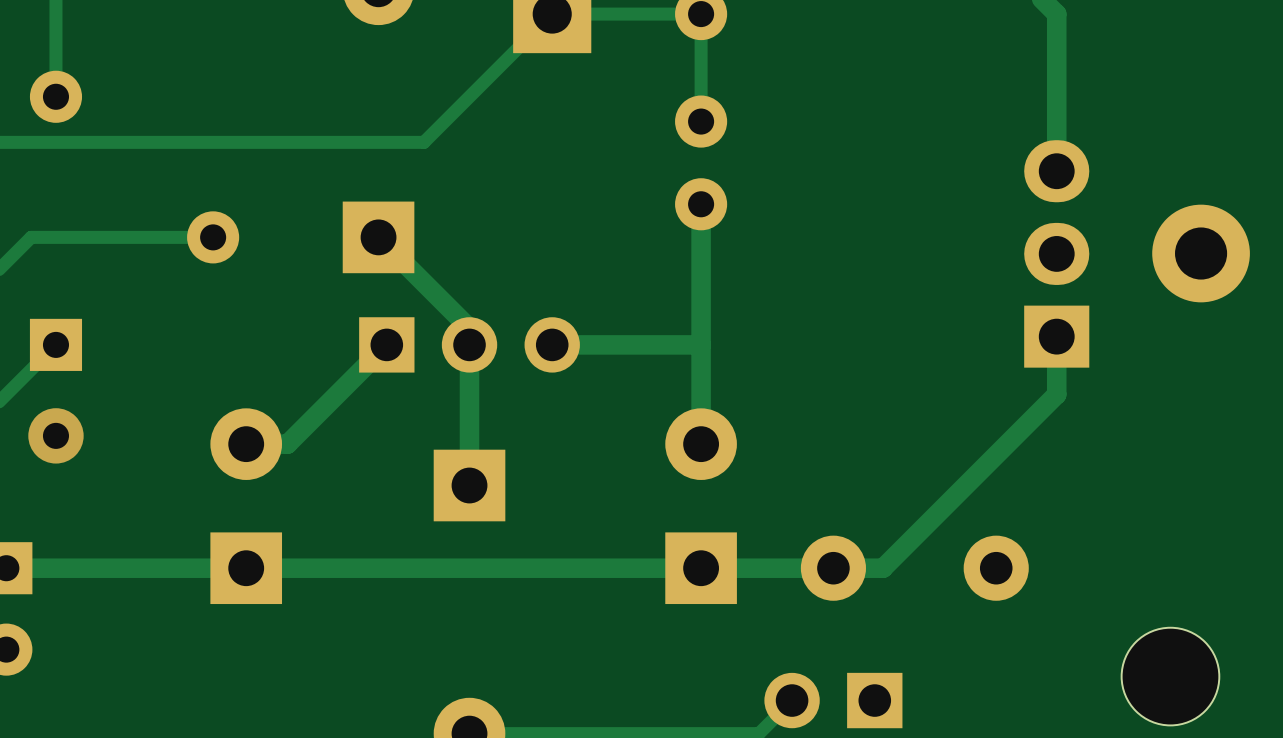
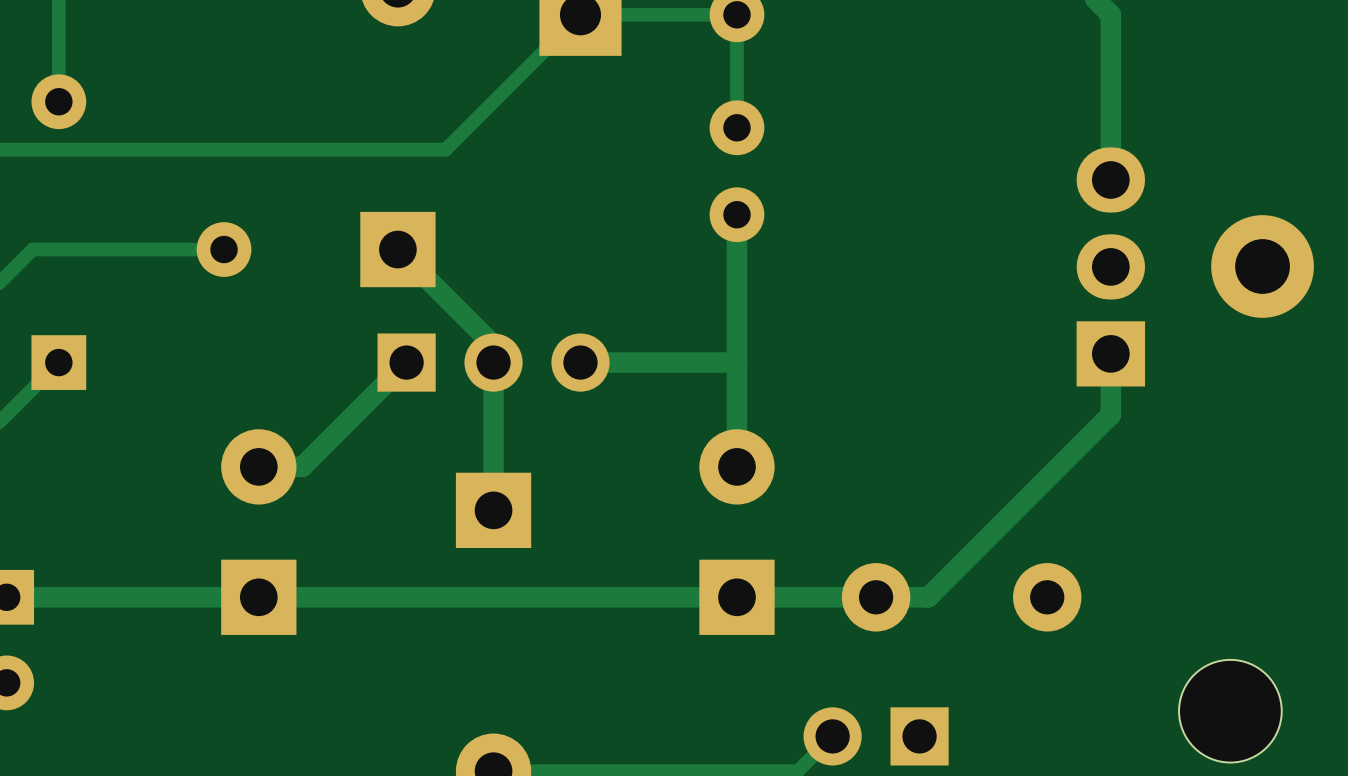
via: (55, 435) -> none

